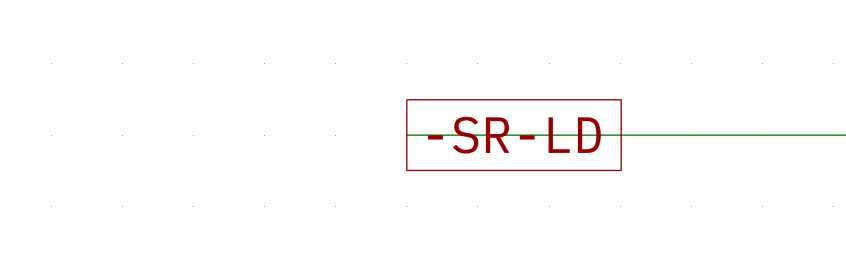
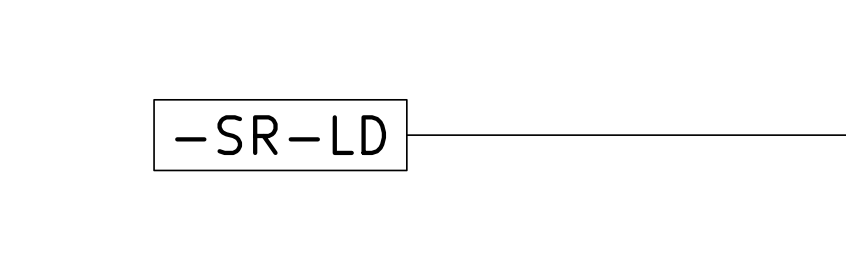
global label rotation: 0° (514, 135) -> 180° (280, 135)

